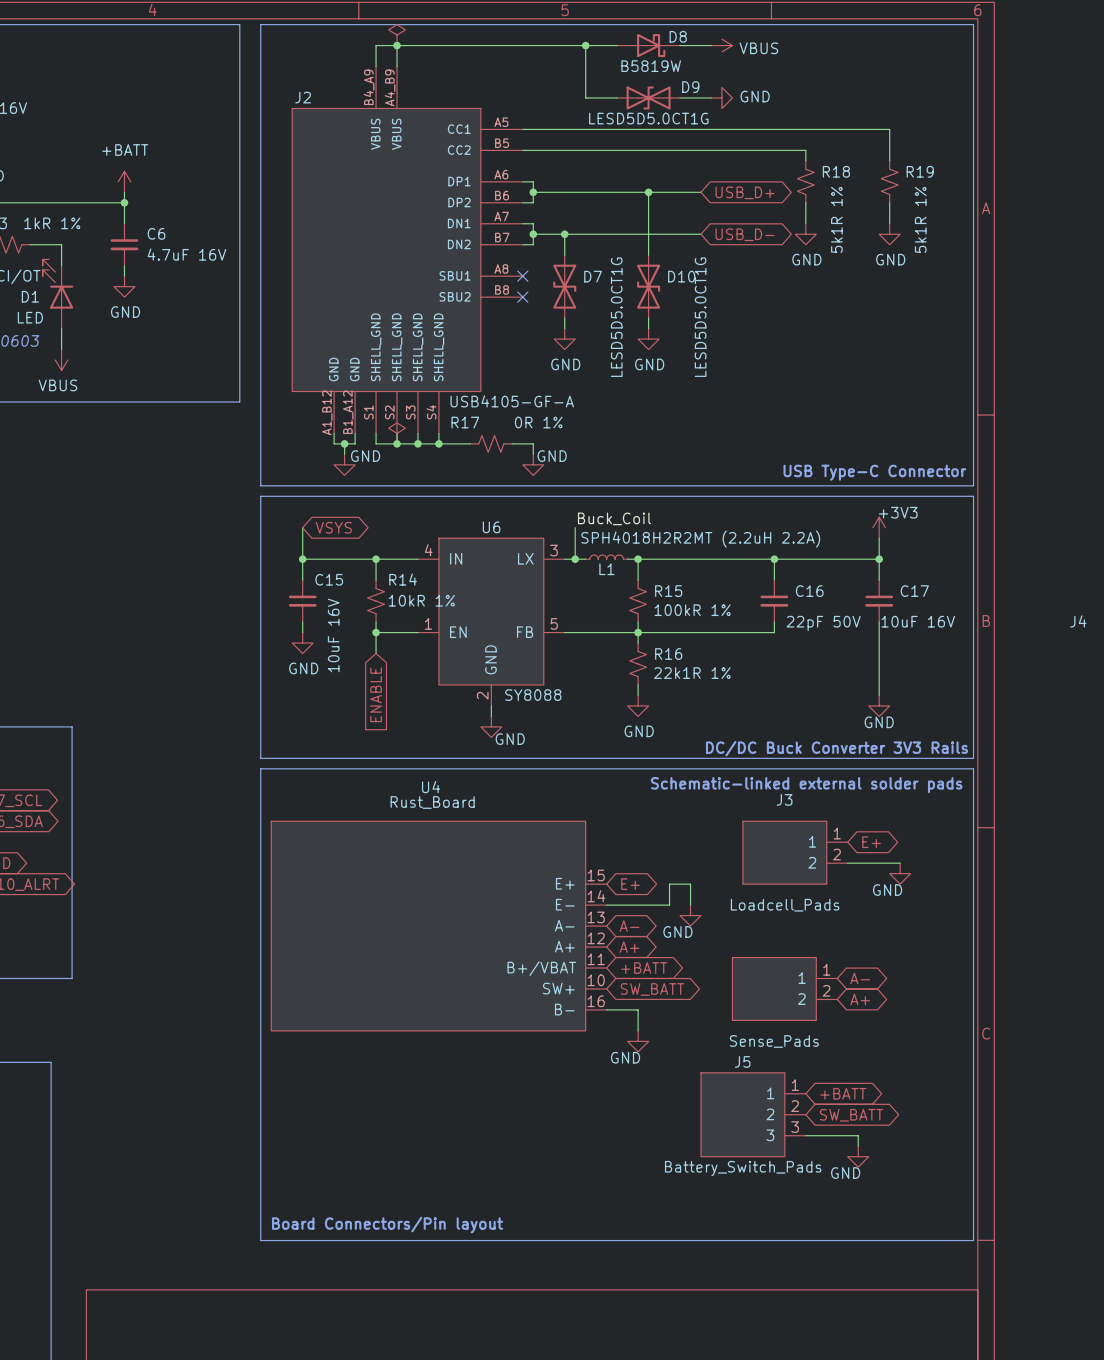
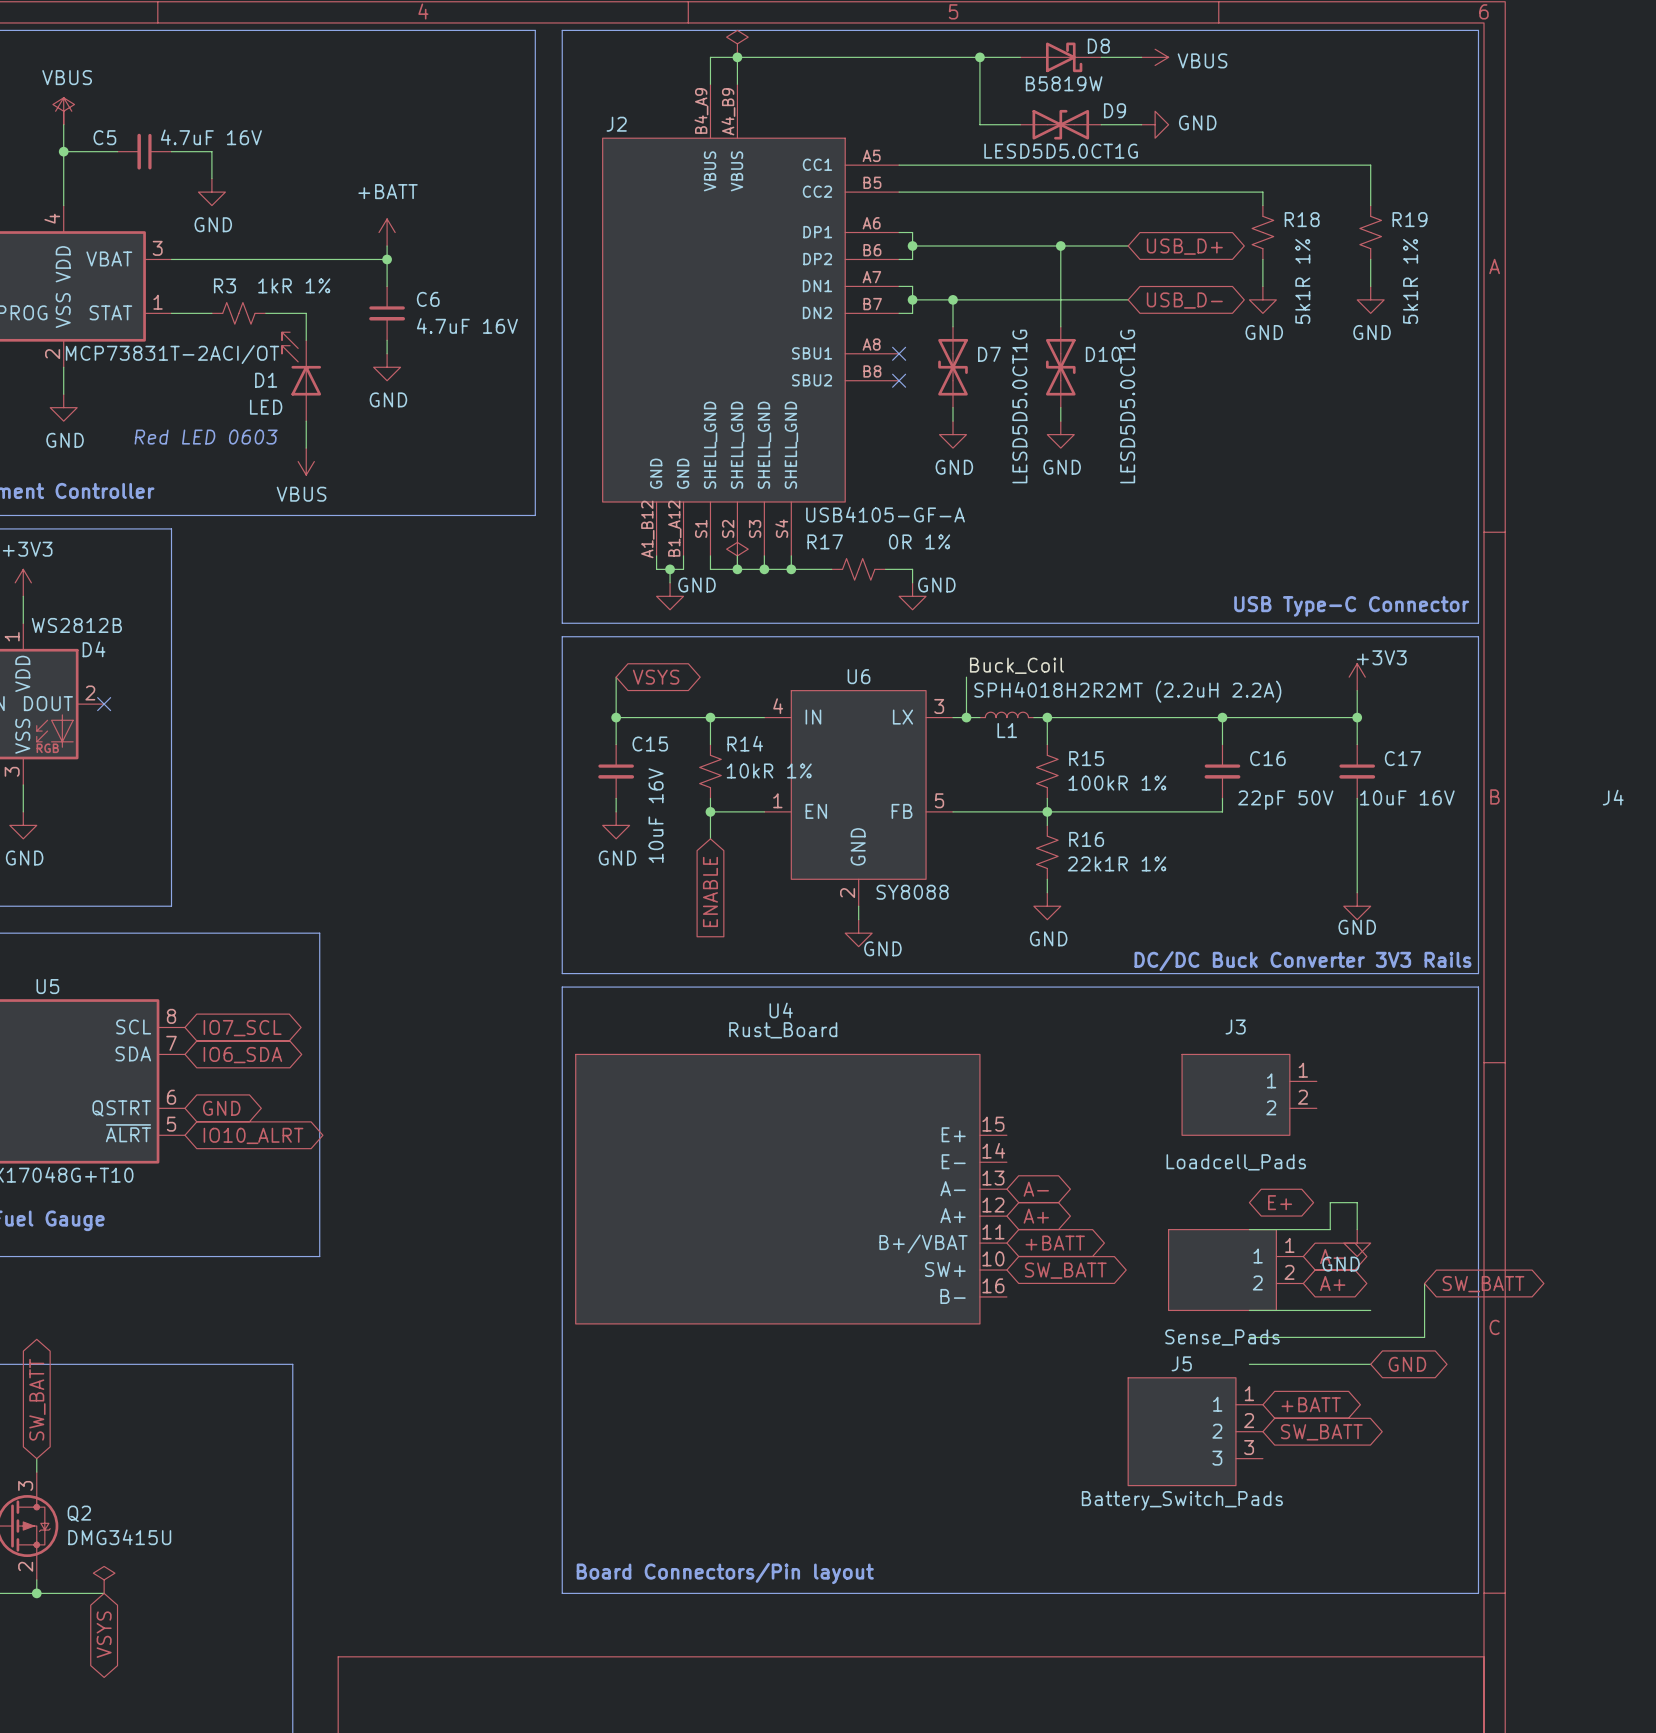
text: Schematic-linked external solder pads (806, 785) -> none
global label: E+ (871, 842) -> none
wire: (847, 863) (900, 863) -> none
power symbol: GND (900, 873) -> none
global label: E+ (630, 884) -> none
wire: (606, 905) (669, 905) (669, 884) (690, 884) (690, 905) -> (1249, 1229) (1330, 1229) (1330, 1202) (1357, 1202) (1357, 1229)
power symbol: GND (690, 915) -> none
global label: none -> E+ (1280, 1202)
power symbol: none -> GND (1357, 1243)
wire: none -> (1424, 1283) (1424, 1337) (1249, 1337)
global label: none -> SW_BATT (1483, 1284)
wire: (606, 1009) (638, 1009) (638, 1030) -> none
wire: none -> (1249, 1310) (1370, 1310)
power symbol: GND (638, 1041) -> none
wire: none -> (1249, 1364) (1370, 1364)
global label: none -> GND (1407, 1364)
wire: (805, 1135) (858, 1135) (858, 1146) -> none
power symbol: GND (858, 1156) -> none

